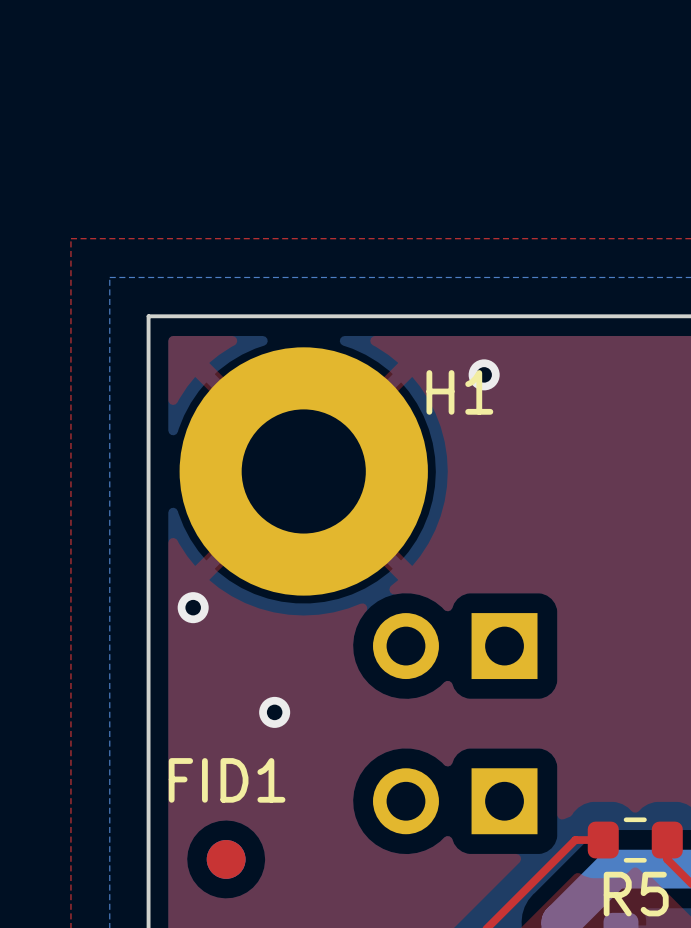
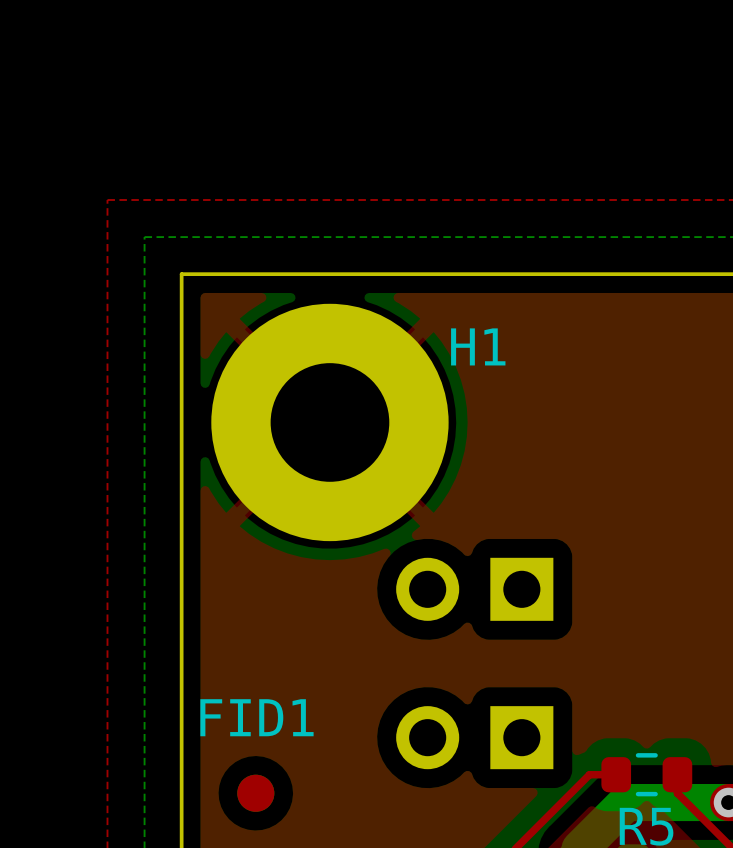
via: (484, 374) -> none
via: (193, 607) -> none
via: (274, 712) -> none

